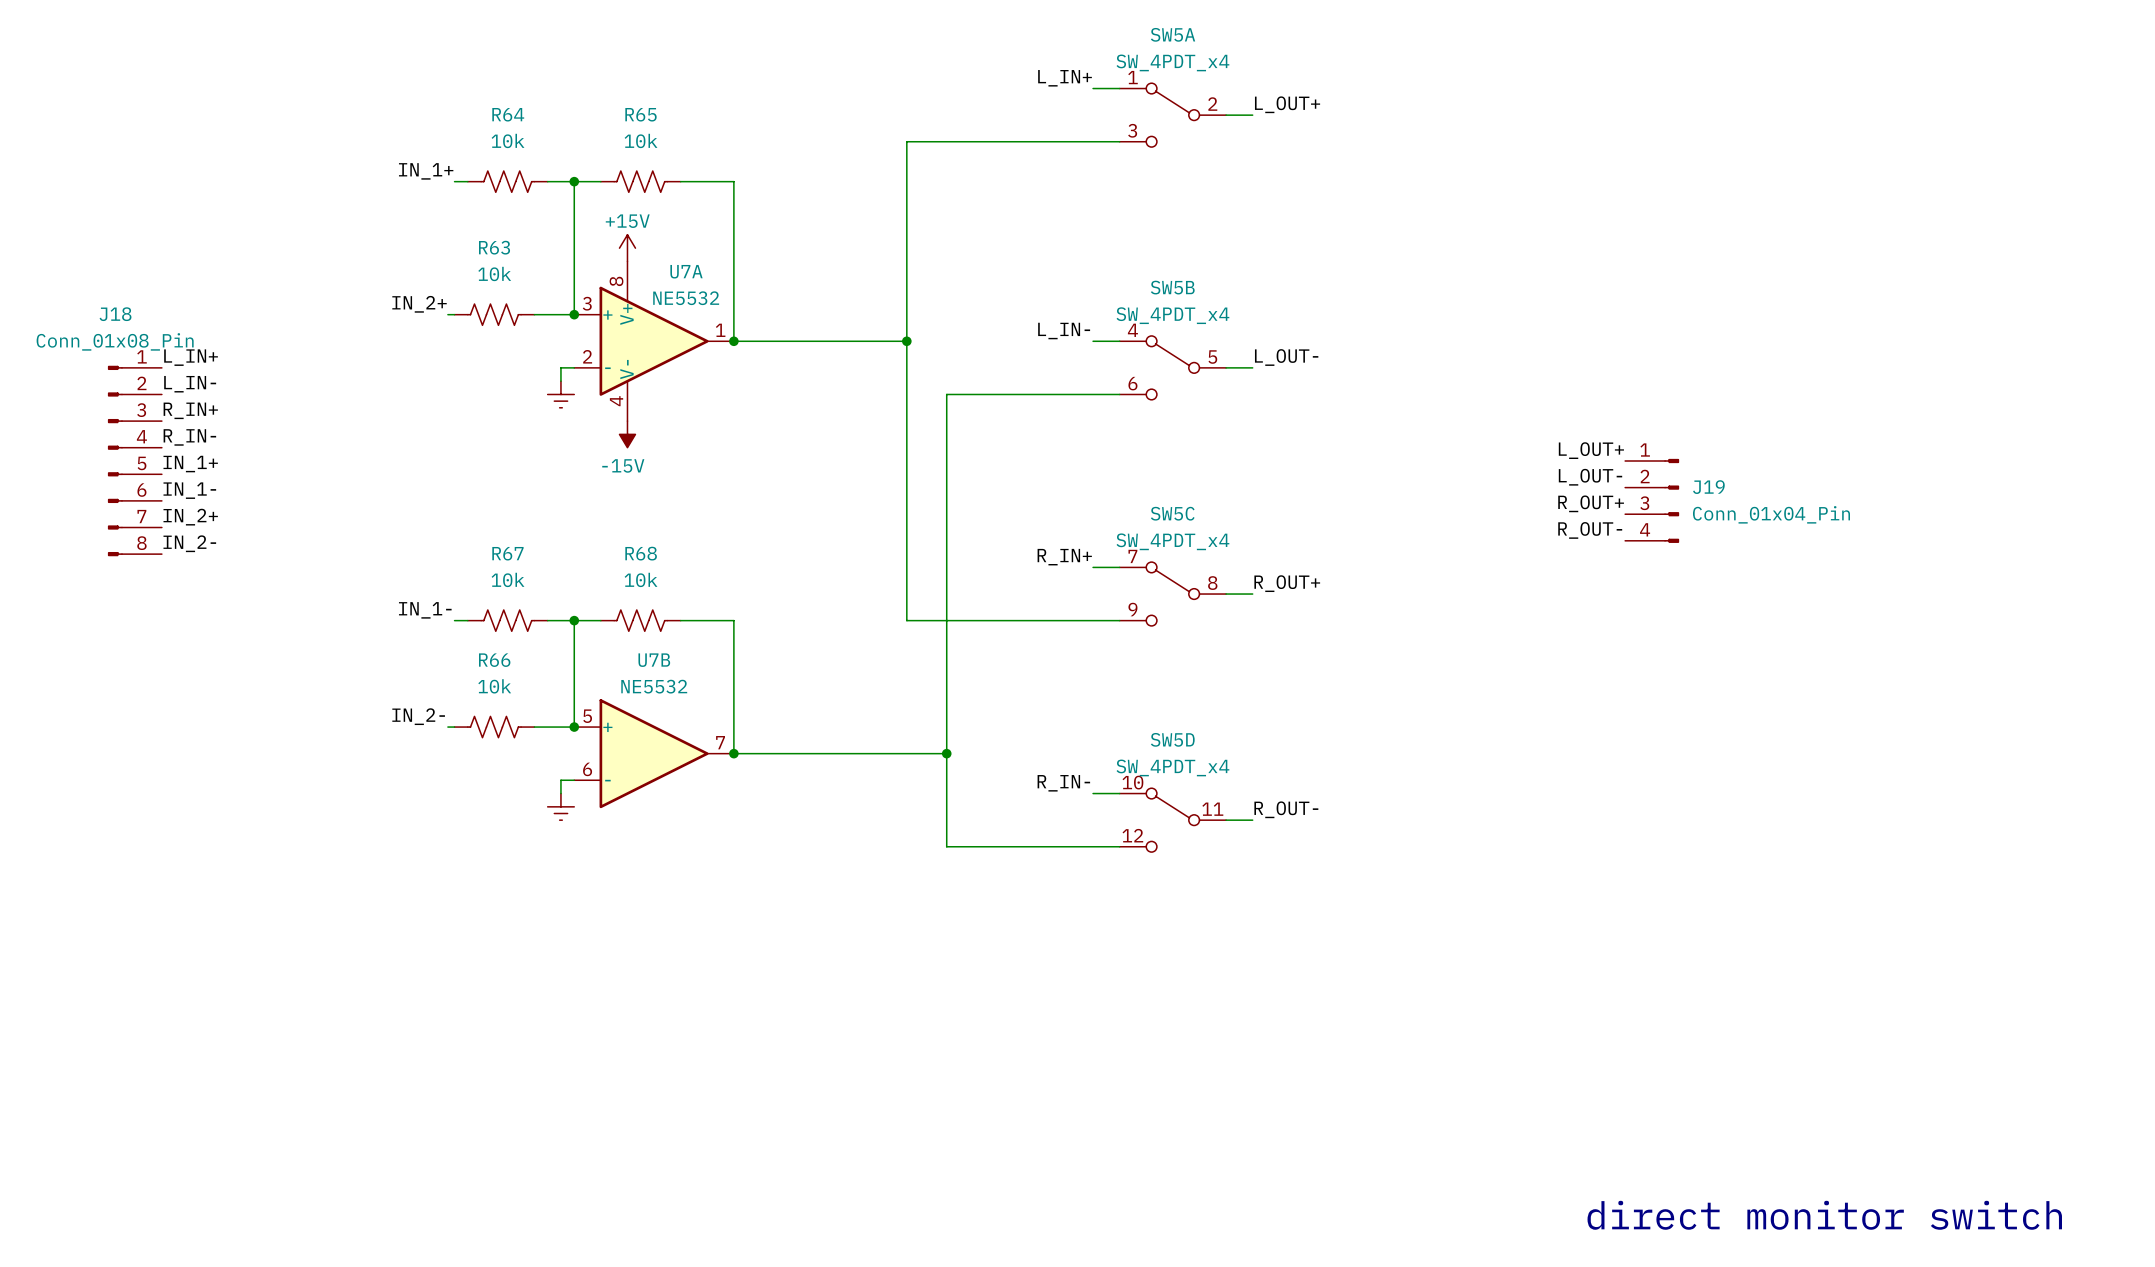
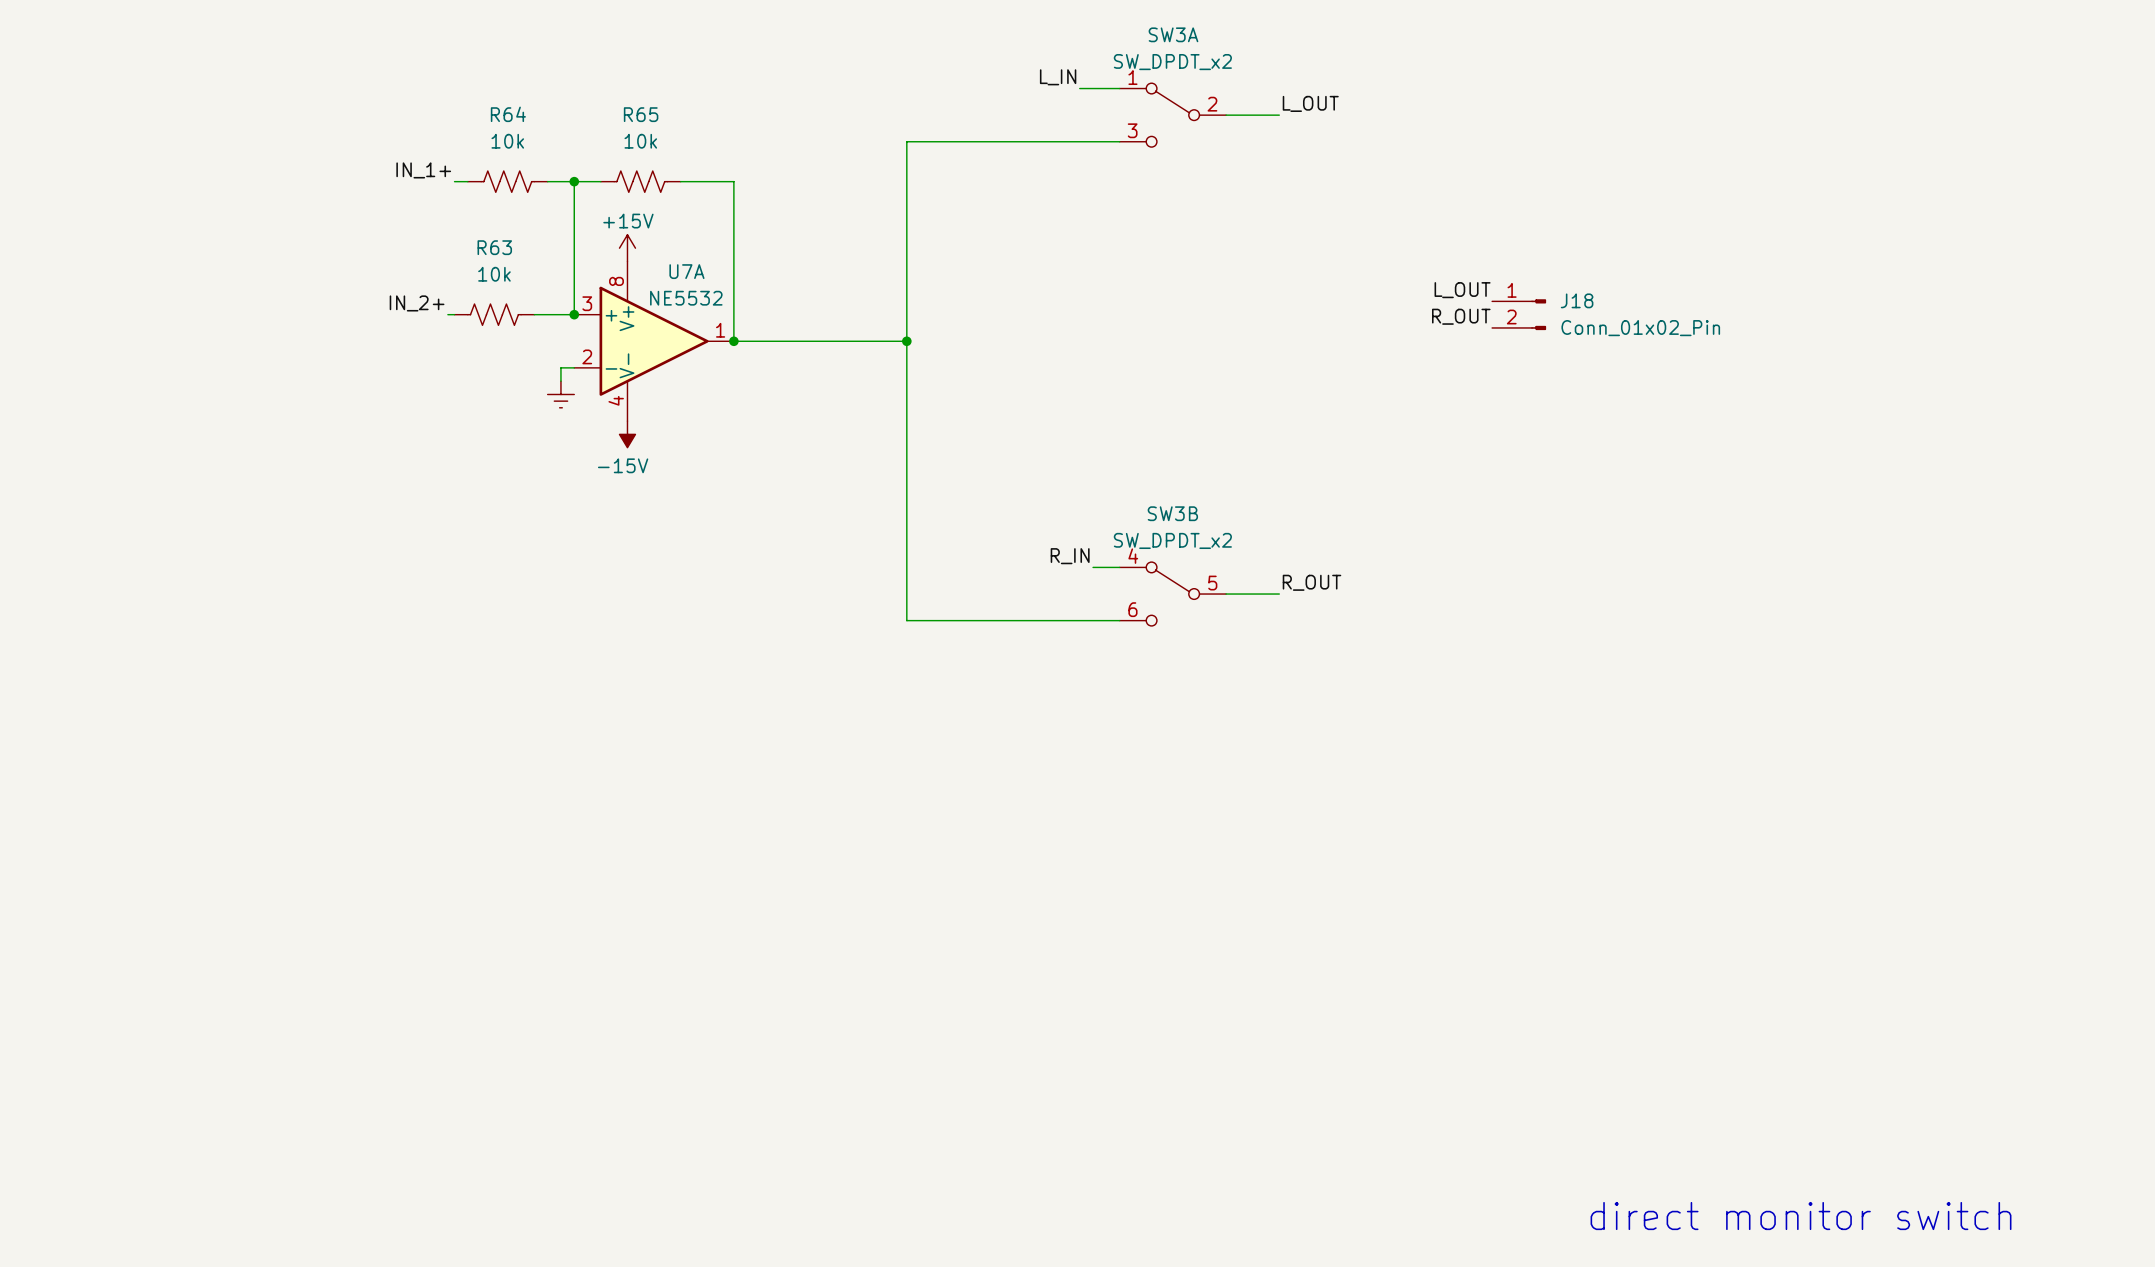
SW5A name: SW5A (1173, 34) -> SW3A (1173, 34)
SW5A value: SW_4PDT_x4 (1172, 62) -> SW_DPDT_x2 (1172, 62)
label: L_IN+ (1065, 78) -> L_IN (1058, 77)
wire: none -> (1079, 88) (1093, 88)
label: L_OUT+ (1287, 104) -> L_OUT (1310, 103)
label: none -> L_OUT (1462, 290)
J18 name position: J18 (115, 314) -> J18 (1577, 300)
label: none -> R_OUT (1461, 316)
label: L_IN- (1064, 331) -> none
J18 value: Conn_01x08_Pin (115, 341) -> Conn_01x02_Pin (1640, 328)
wire: (1093, 341) (1119, 341) -> none
label: L_IN+ (191, 357) -> none
label: L_OUT- (1286, 357) -> none
J18 symbol: [107, 365, 162, 557] -> [1492, 299, 1547, 331]
SW5B: SW_4PDT_x4 (1172, 367) -> none
wire: (1226, 367) (1252, 367) -> (1252, 115) (1279, 115)
label: L_IN- (190, 384) -> none
wire: (1119, 394) (946, 394) (946, 846) (1119, 846) -> none
label: R_IN+ (190, 410) -> none
label: R_IN- (189, 437) -> none
label: L_OUT+ (1591, 450) -> none
label: IN_1+ (190, 464) -> none
label: L_OUT- (1590, 477) -> none
label: IN_1- (189, 490) -> none
J19: Conn_01x04_Pin (1652, 500) -> none
label: R_OUT+ (1591, 503) -> none
SW5C name: SW5C (1172, 513) -> SW3B (1172, 513)
label: IN_2+ (190, 517) -> none
label: R_OUT- (1590, 530) -> none
SW5C value: SW_4PDT_x4 (1172, 541) -> SW_DPDT_x2 (1172, 540)
label: IN_2- (189, 543) -> none
SW5C pin number: 7 (1132, 556) -> 4 (1133, 556)
label: R_IN+ (1064, 557) -> R_IN (1070, 556)
SW5C pin number: 8 (1212, 583) -> 5 (1212, 583)
label: R_OUT+ (1287, 583) -> R_OUT (1312, 582)
SW5C pin number: 9 (1132, 609) -> 6 (1132, 609)
label: IN_1- (425, 610) -> none
wire: (454, 620) (467, 620) -> none
R67: 10k (507, 620) -> none
wire: (547, 620) (600, 620) -> none
wire: (574, 620) (574, 727) (534, 727) -> none
junction: (574, 620) -> none
R68: 10k (640, 620) -> none
wire: (680, 620) (733, 620) (733, 753) (946, 753) -> none
label: IN_2- (418, 716) -> none
wire: (447, 727) (454, 727) -> none
R66: 10k (494, 727) -> none
junction: (574, 727) -> none
U7B: NE5532 (654, 753) -> none
junction: (733, 753) -> none
junction: (946, 753) -> none
wire: (574, 780) (560, 780) (560, 793) -> none
label: R_IN- (1063, 783) -> none
wire: (1093, 793) (1119, 793) -> none
power symbol: (560, 806) -> none
label: R_OUT- (1286, 809) -> none
SW5D: SW_4PDT_x4 (1172, 820) -> none
wire: (1226, 820) (1252, 820) -> (1252, 594) (1279, 594)

